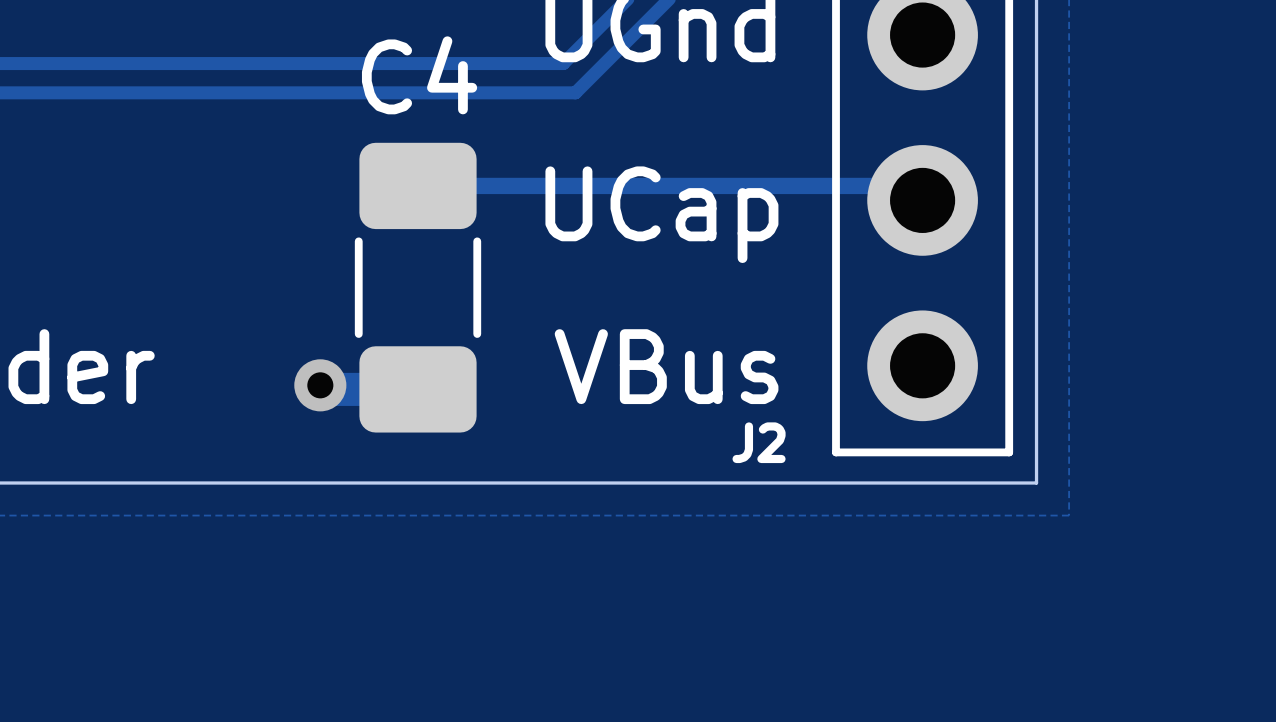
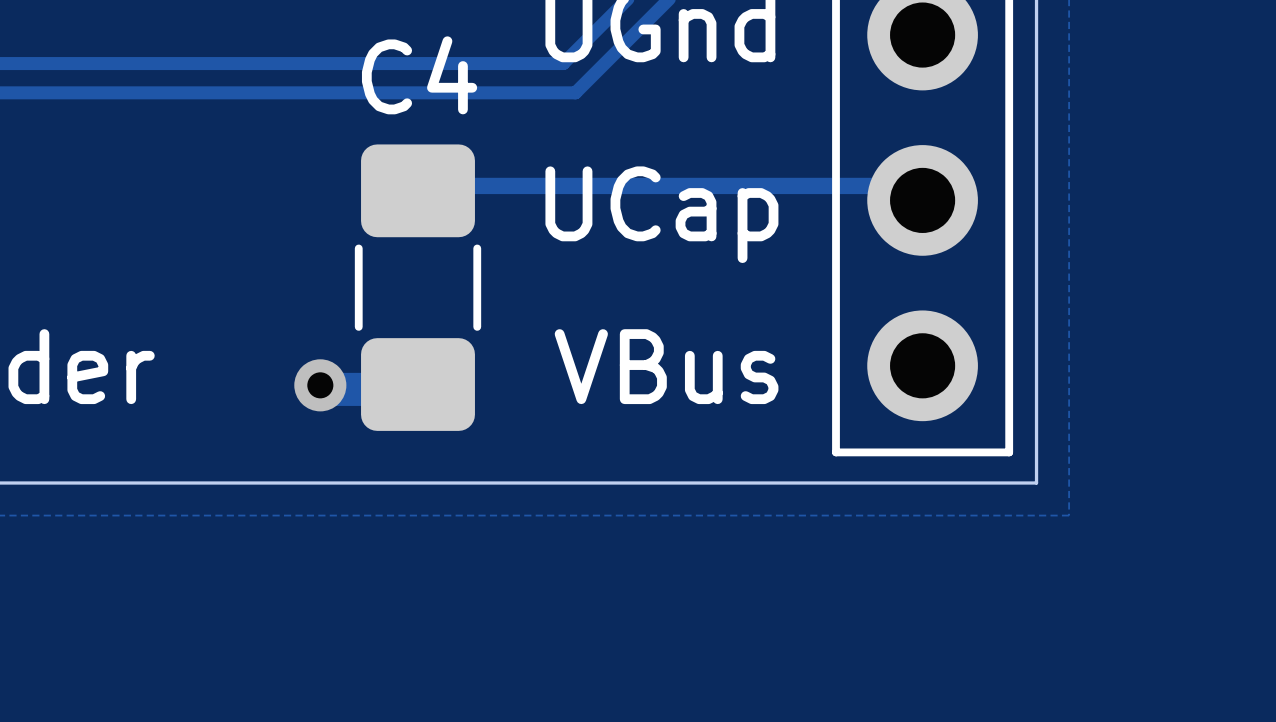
C4 footprint: [354, 142, 482, 433] -> [354, 144, 482, 431]
J2 name: J2 (759, 442) -> none

